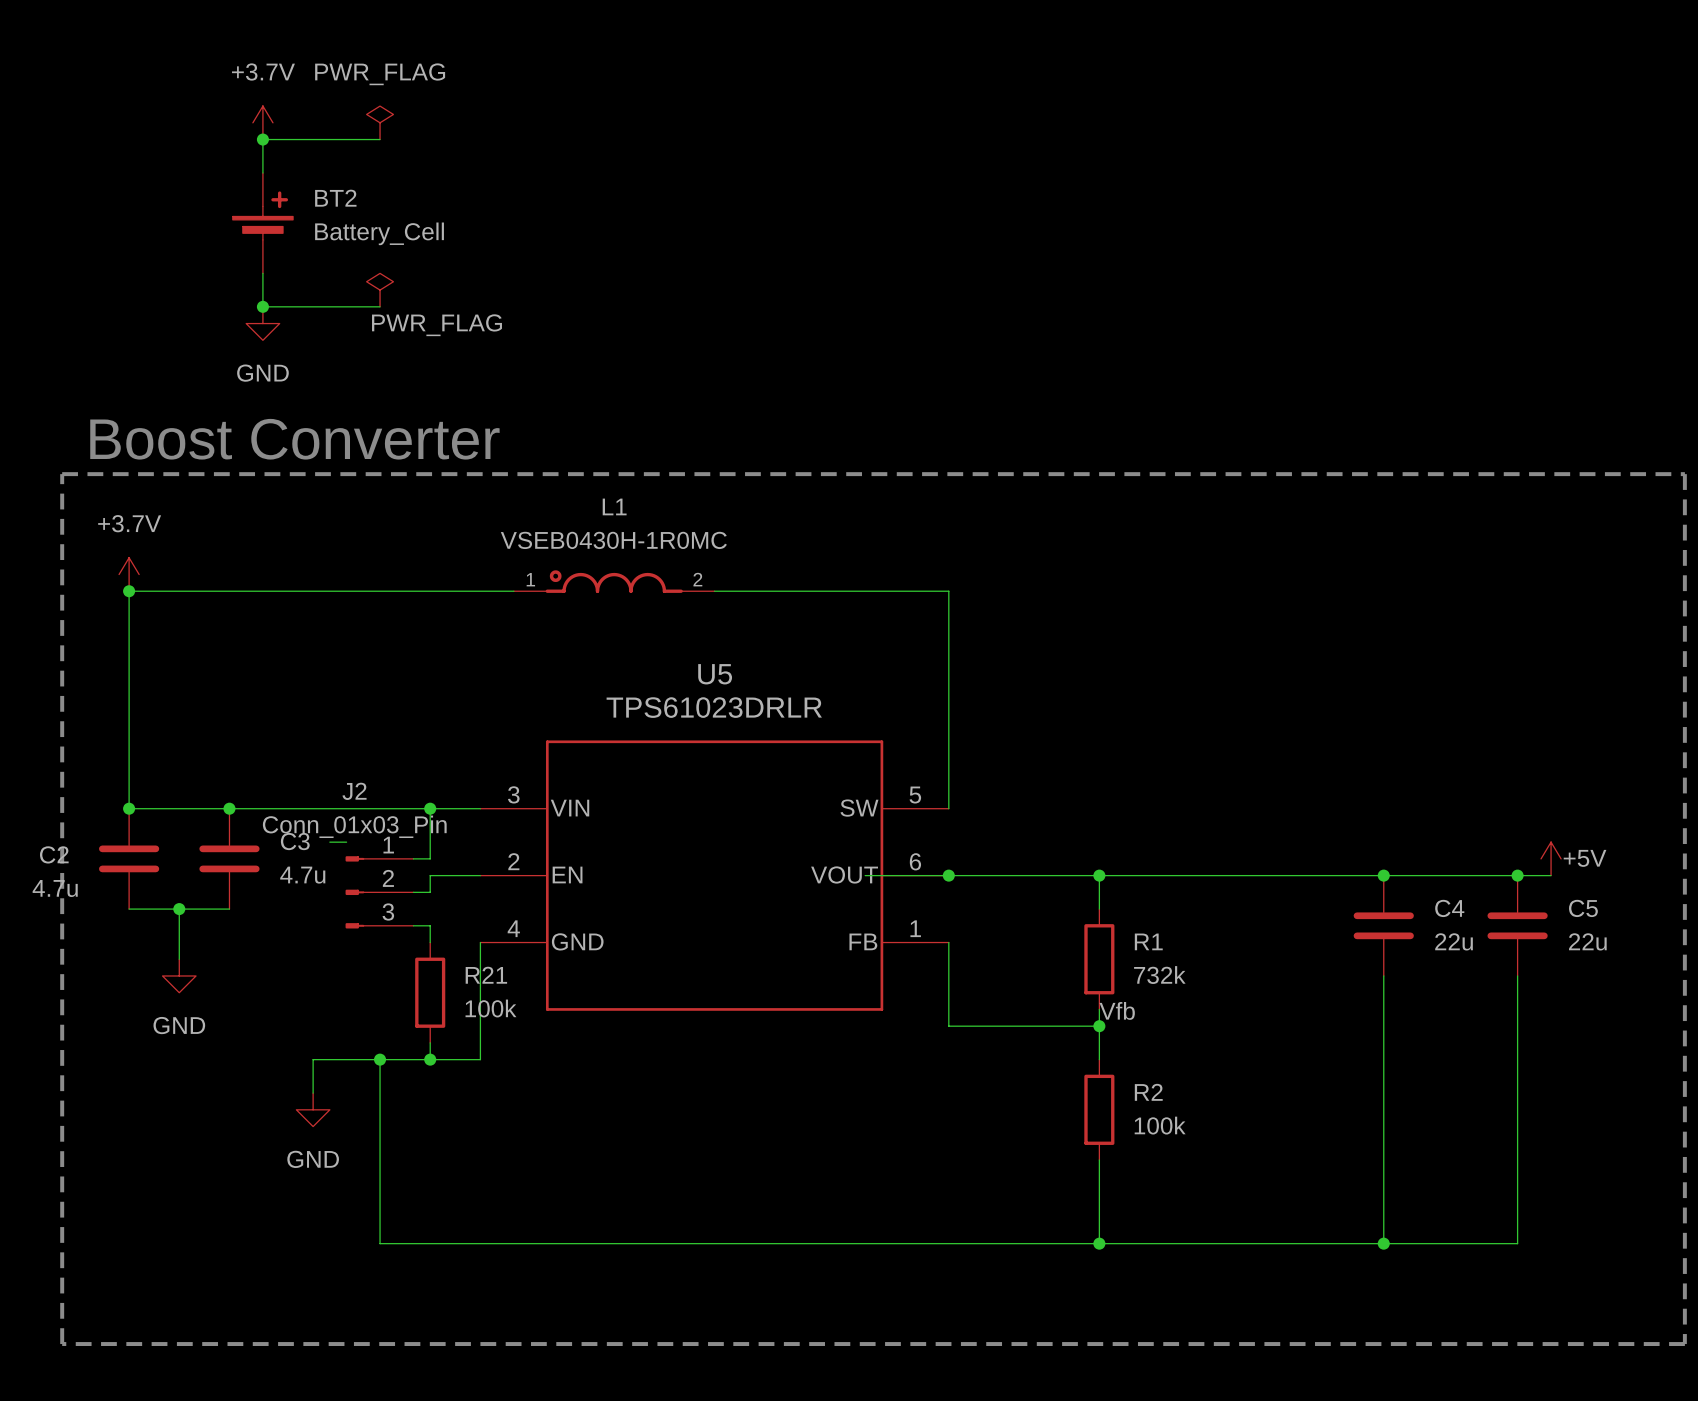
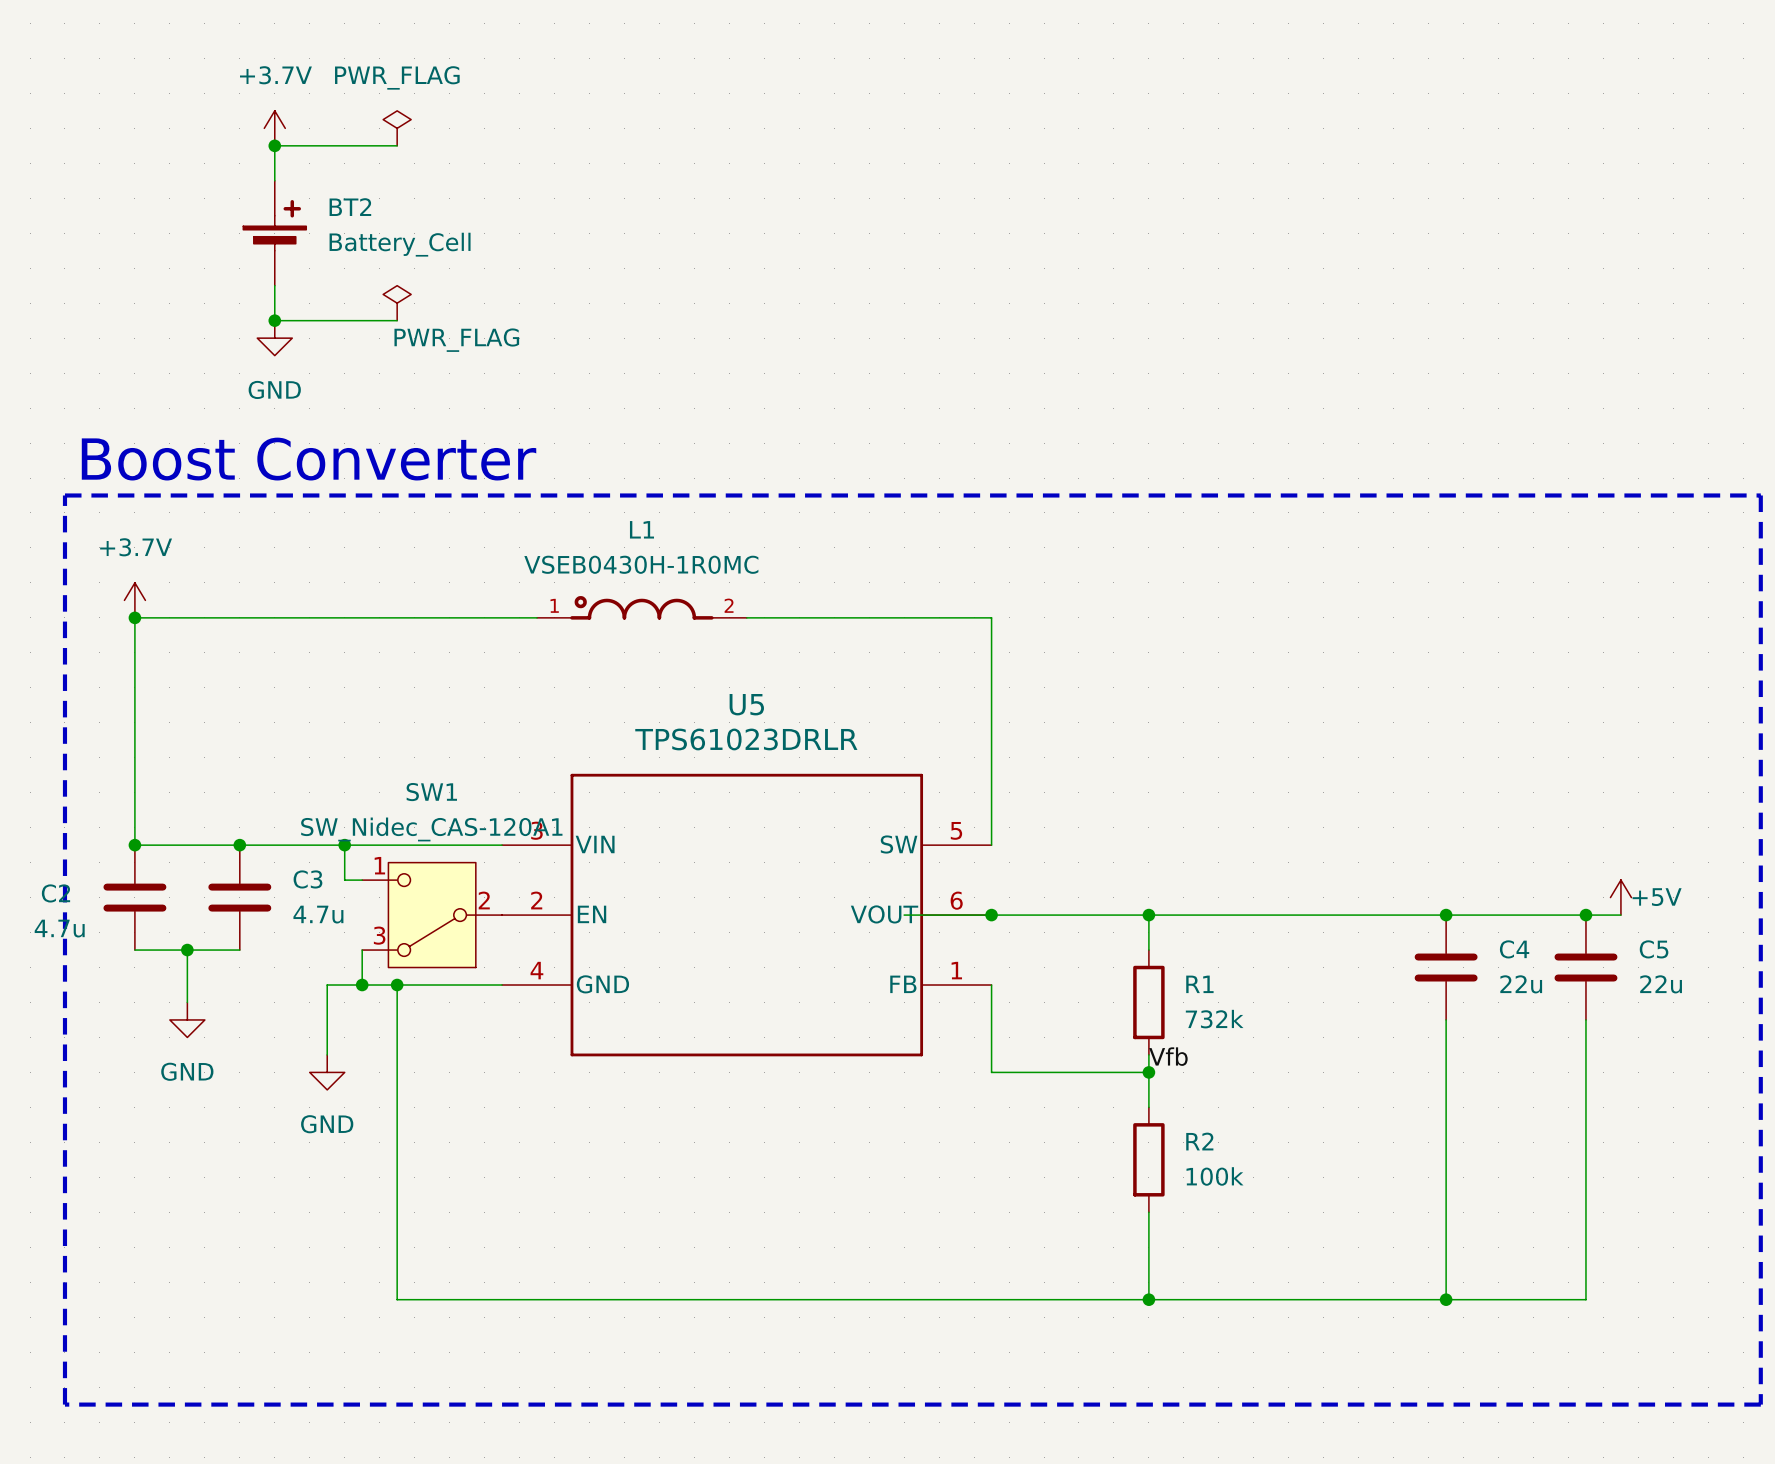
wire: none -> (344, 845) (344, 880)
junction: none -> (344, 845)
junction: (430, 808) -> none
SW1: none -> SW_Nidec_CAS-120A1 (432, 915)
J2: Conn_01x03_Pin (379, 892) -> none
wire: none -> (362, 950) (362, 985)
wire: (413, 925) (430, 925) (430, 942) -> none
junction: none -> (362, 985)
wire: none -> (397, 985) (397, 1107)
junction: none -> (397, 985)
wire: (480, 942) (480, 1059) (313, 1059) (313, 1093) -> (502, 985) (327, 985) (327, 1054)
R21: 100k (430, 992) -> none
wire: (430, 1042) (430, 1059) -> none
junction: (380, 1059) -> none
junction: (430, 1059) -> none
power symbol position: GND (313, 1109) -> GND (327, 1072)

